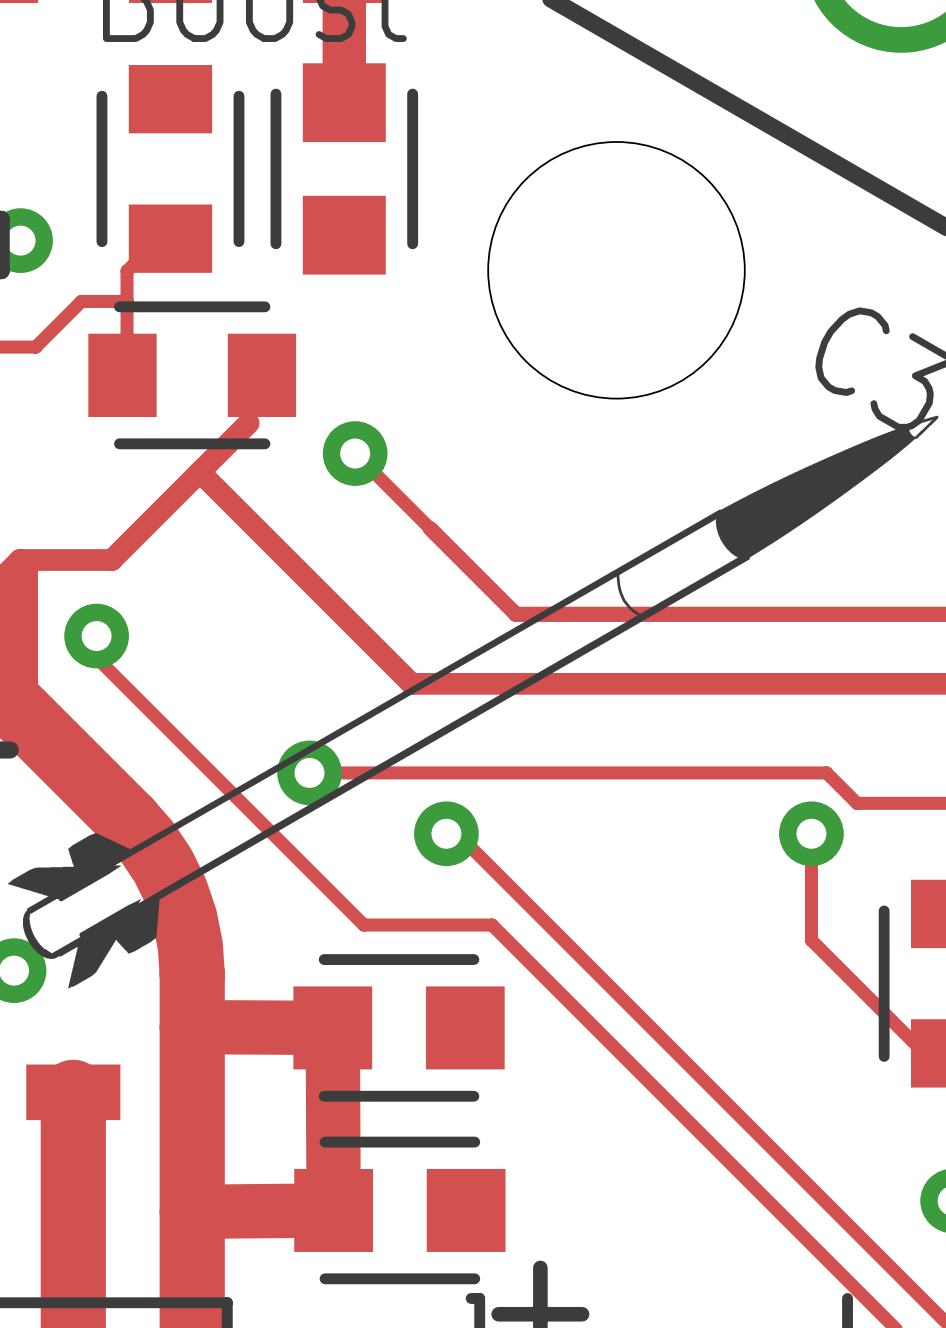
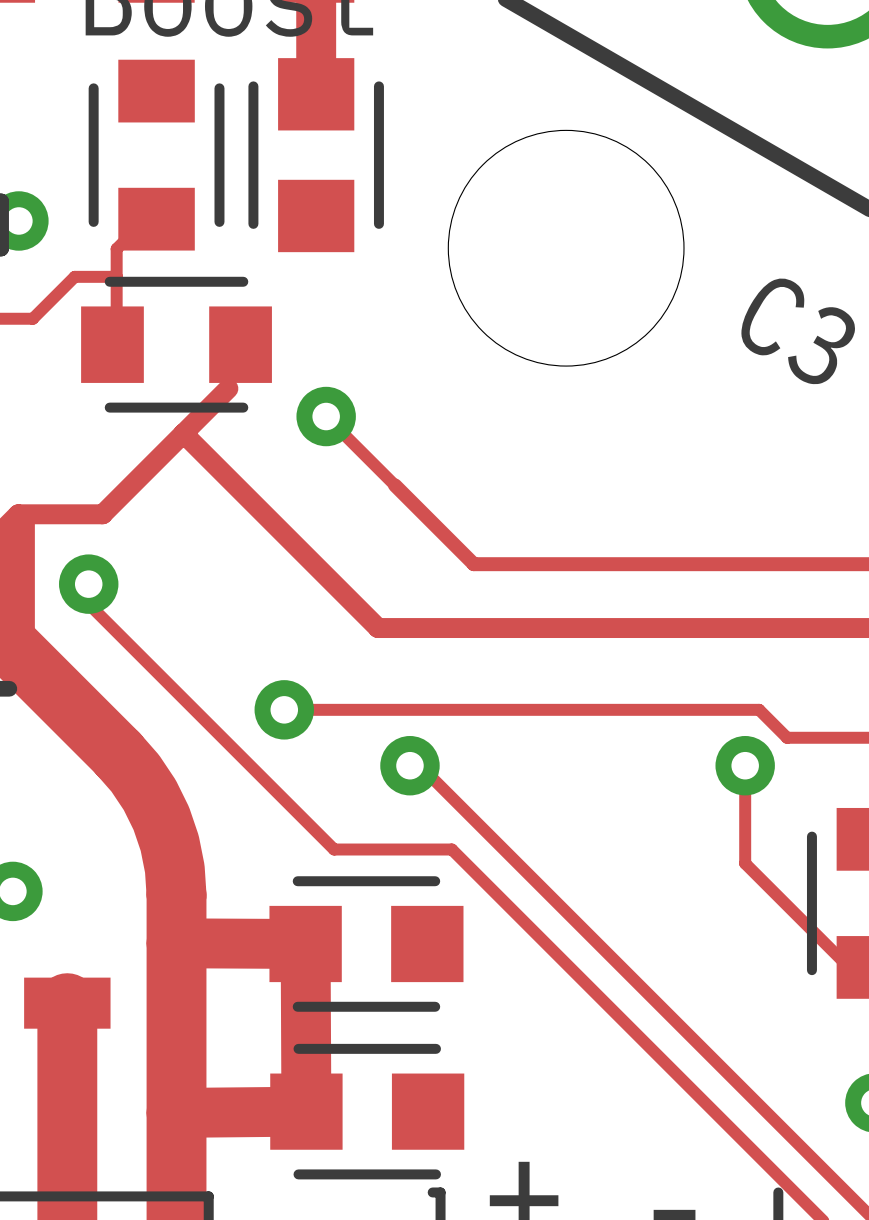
drawing: [7, 415, 939, 989] -> none

